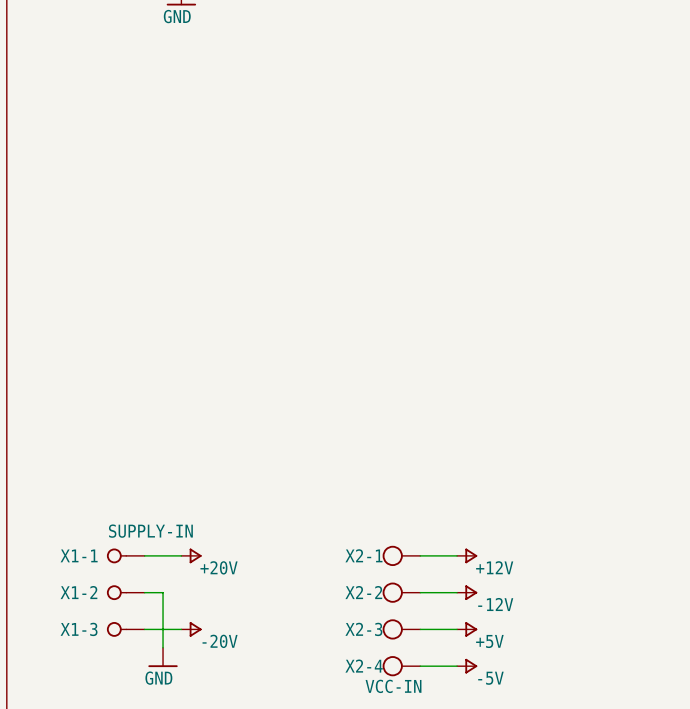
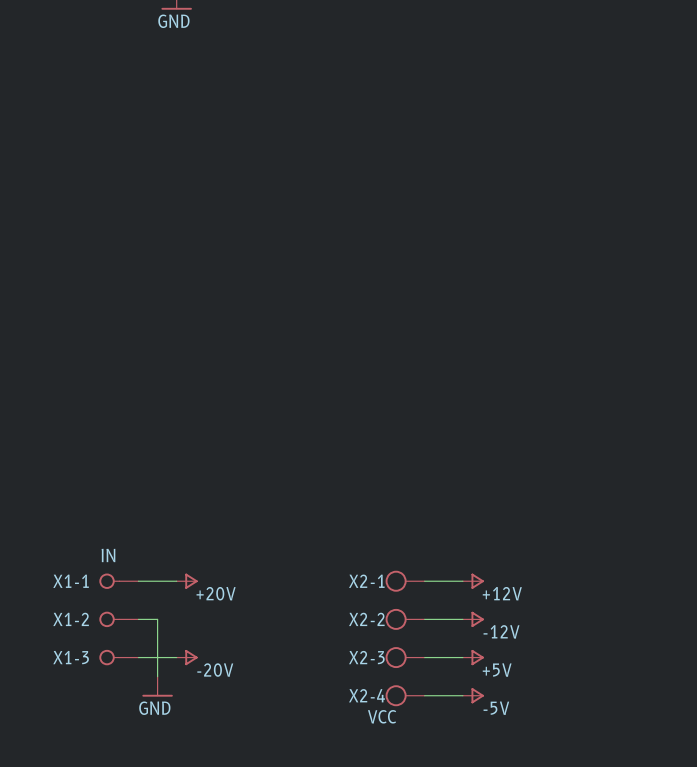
X1-3 value: SUPPLY-IN (150, 531) -> IN (108, 555)
X2-4 value: VCC-IN (393, 686) -> VCC (382, 716)

